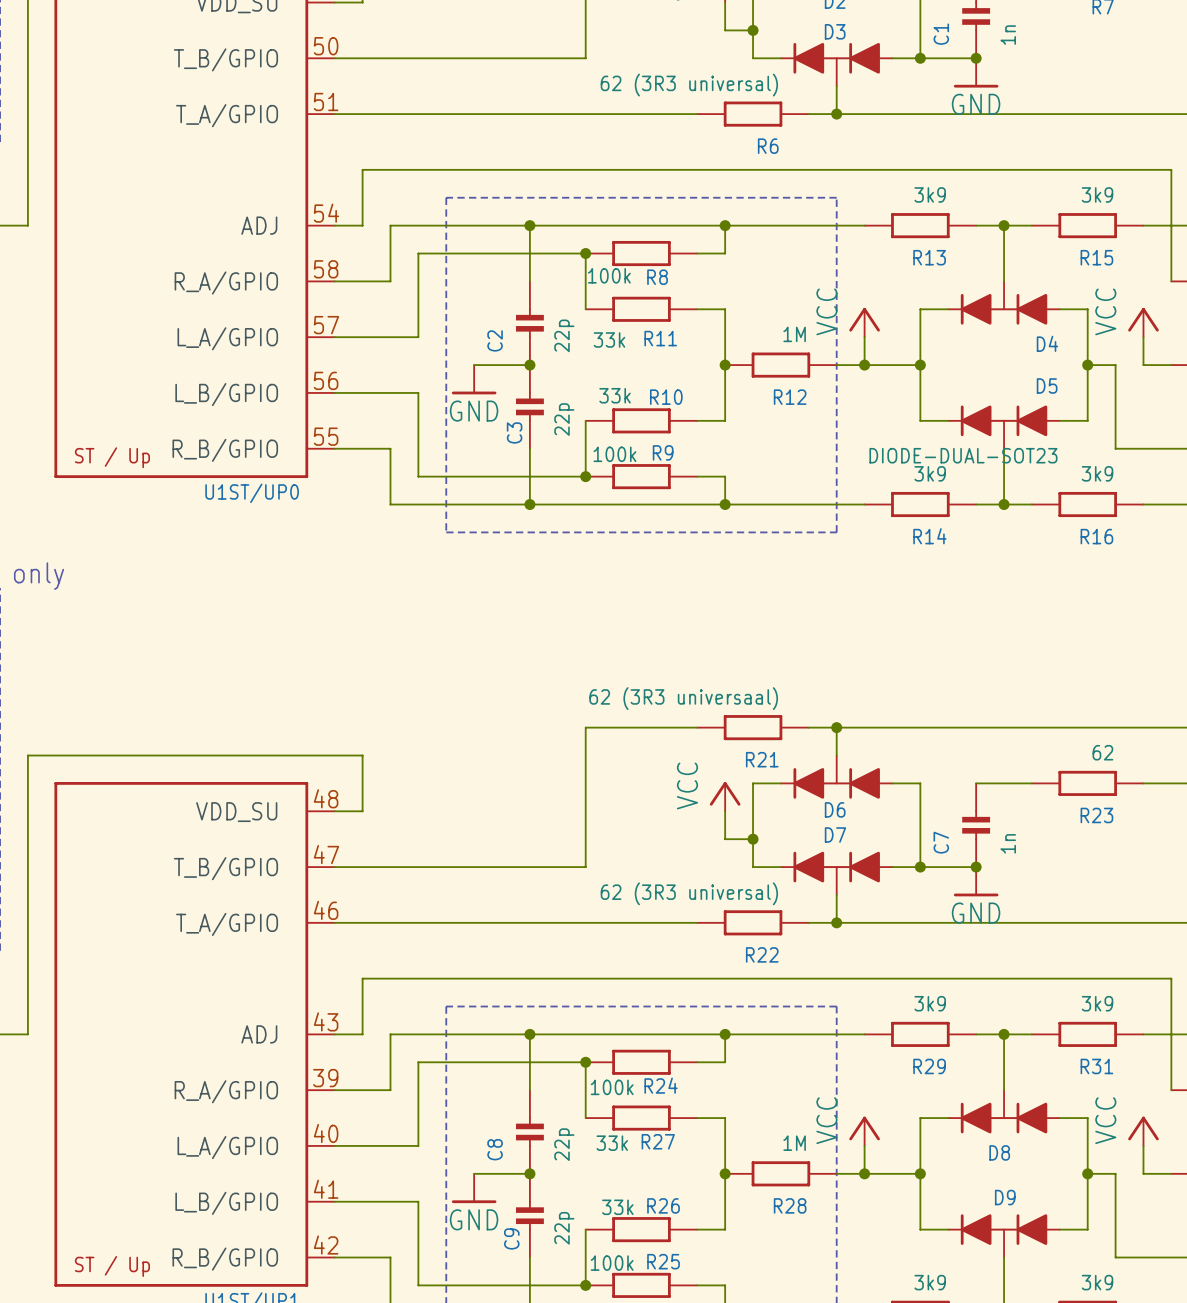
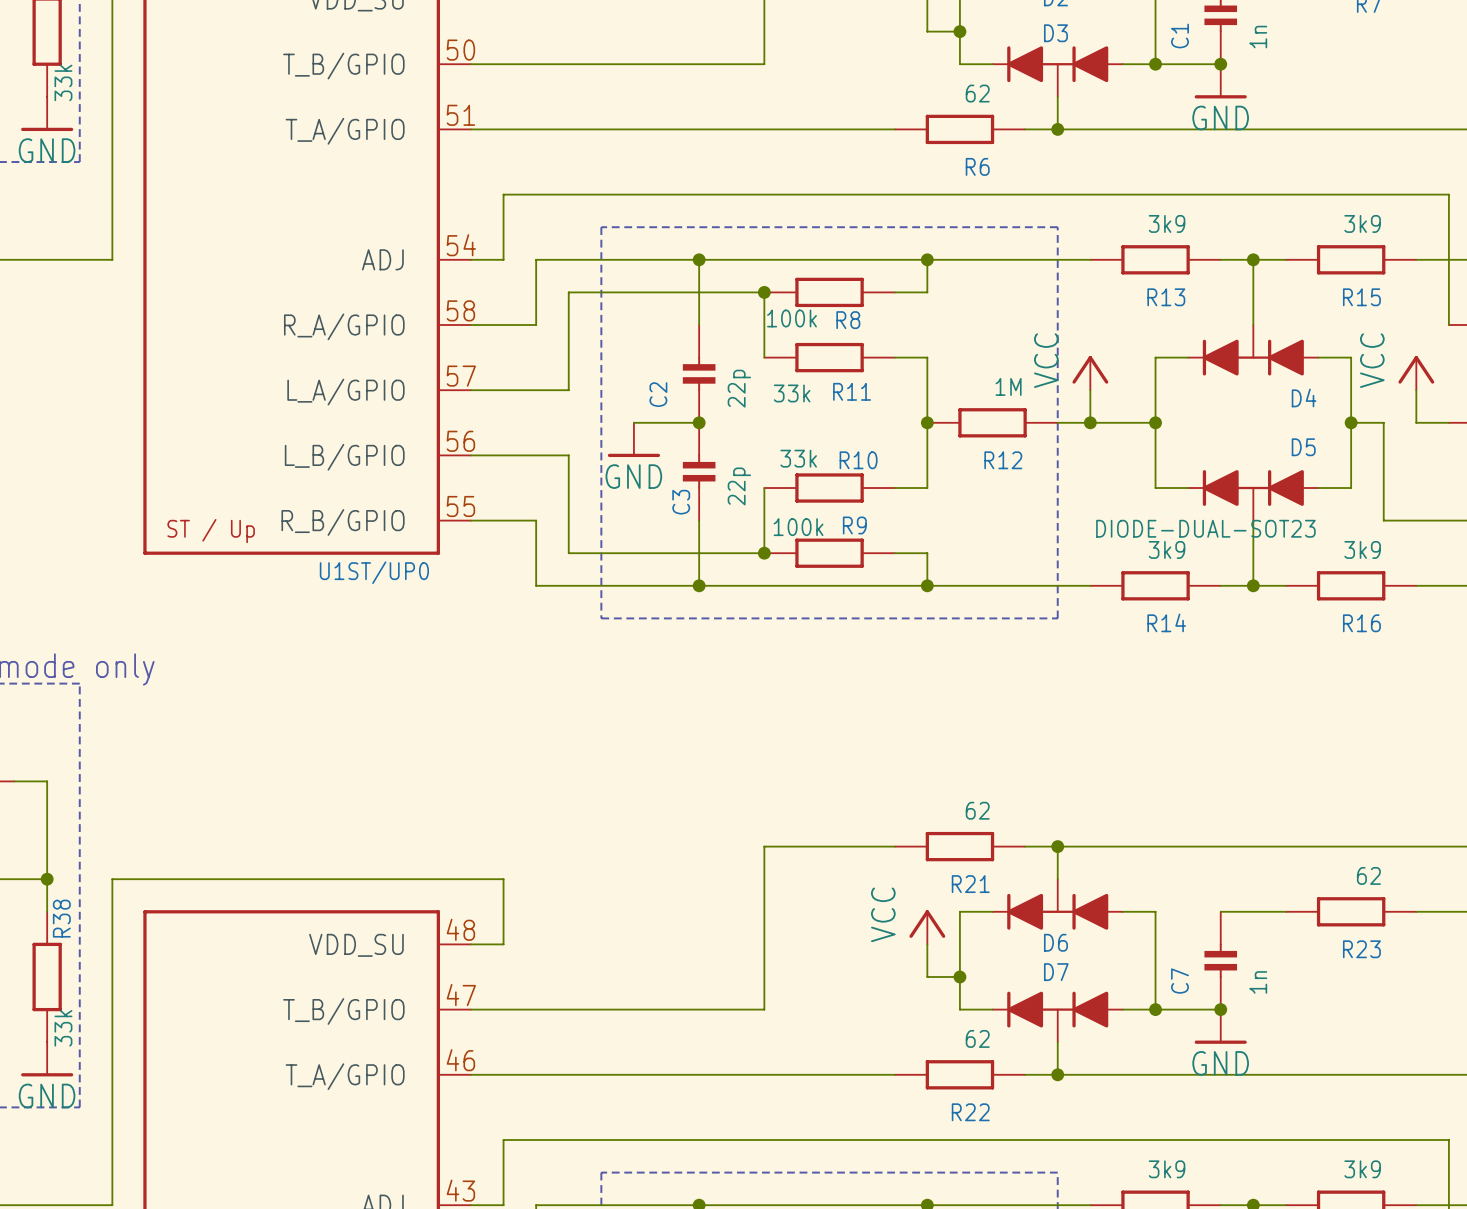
R6 value: 62 (3R3 universal) (689, 85) -> 62 (977, 93)
R21 value: 62 (3R3 universaal) (683, 698) -> 62 (977, 810)
R22 value: 62 (3R3 universal) (689, 893) -> 62 (977, 1038)

